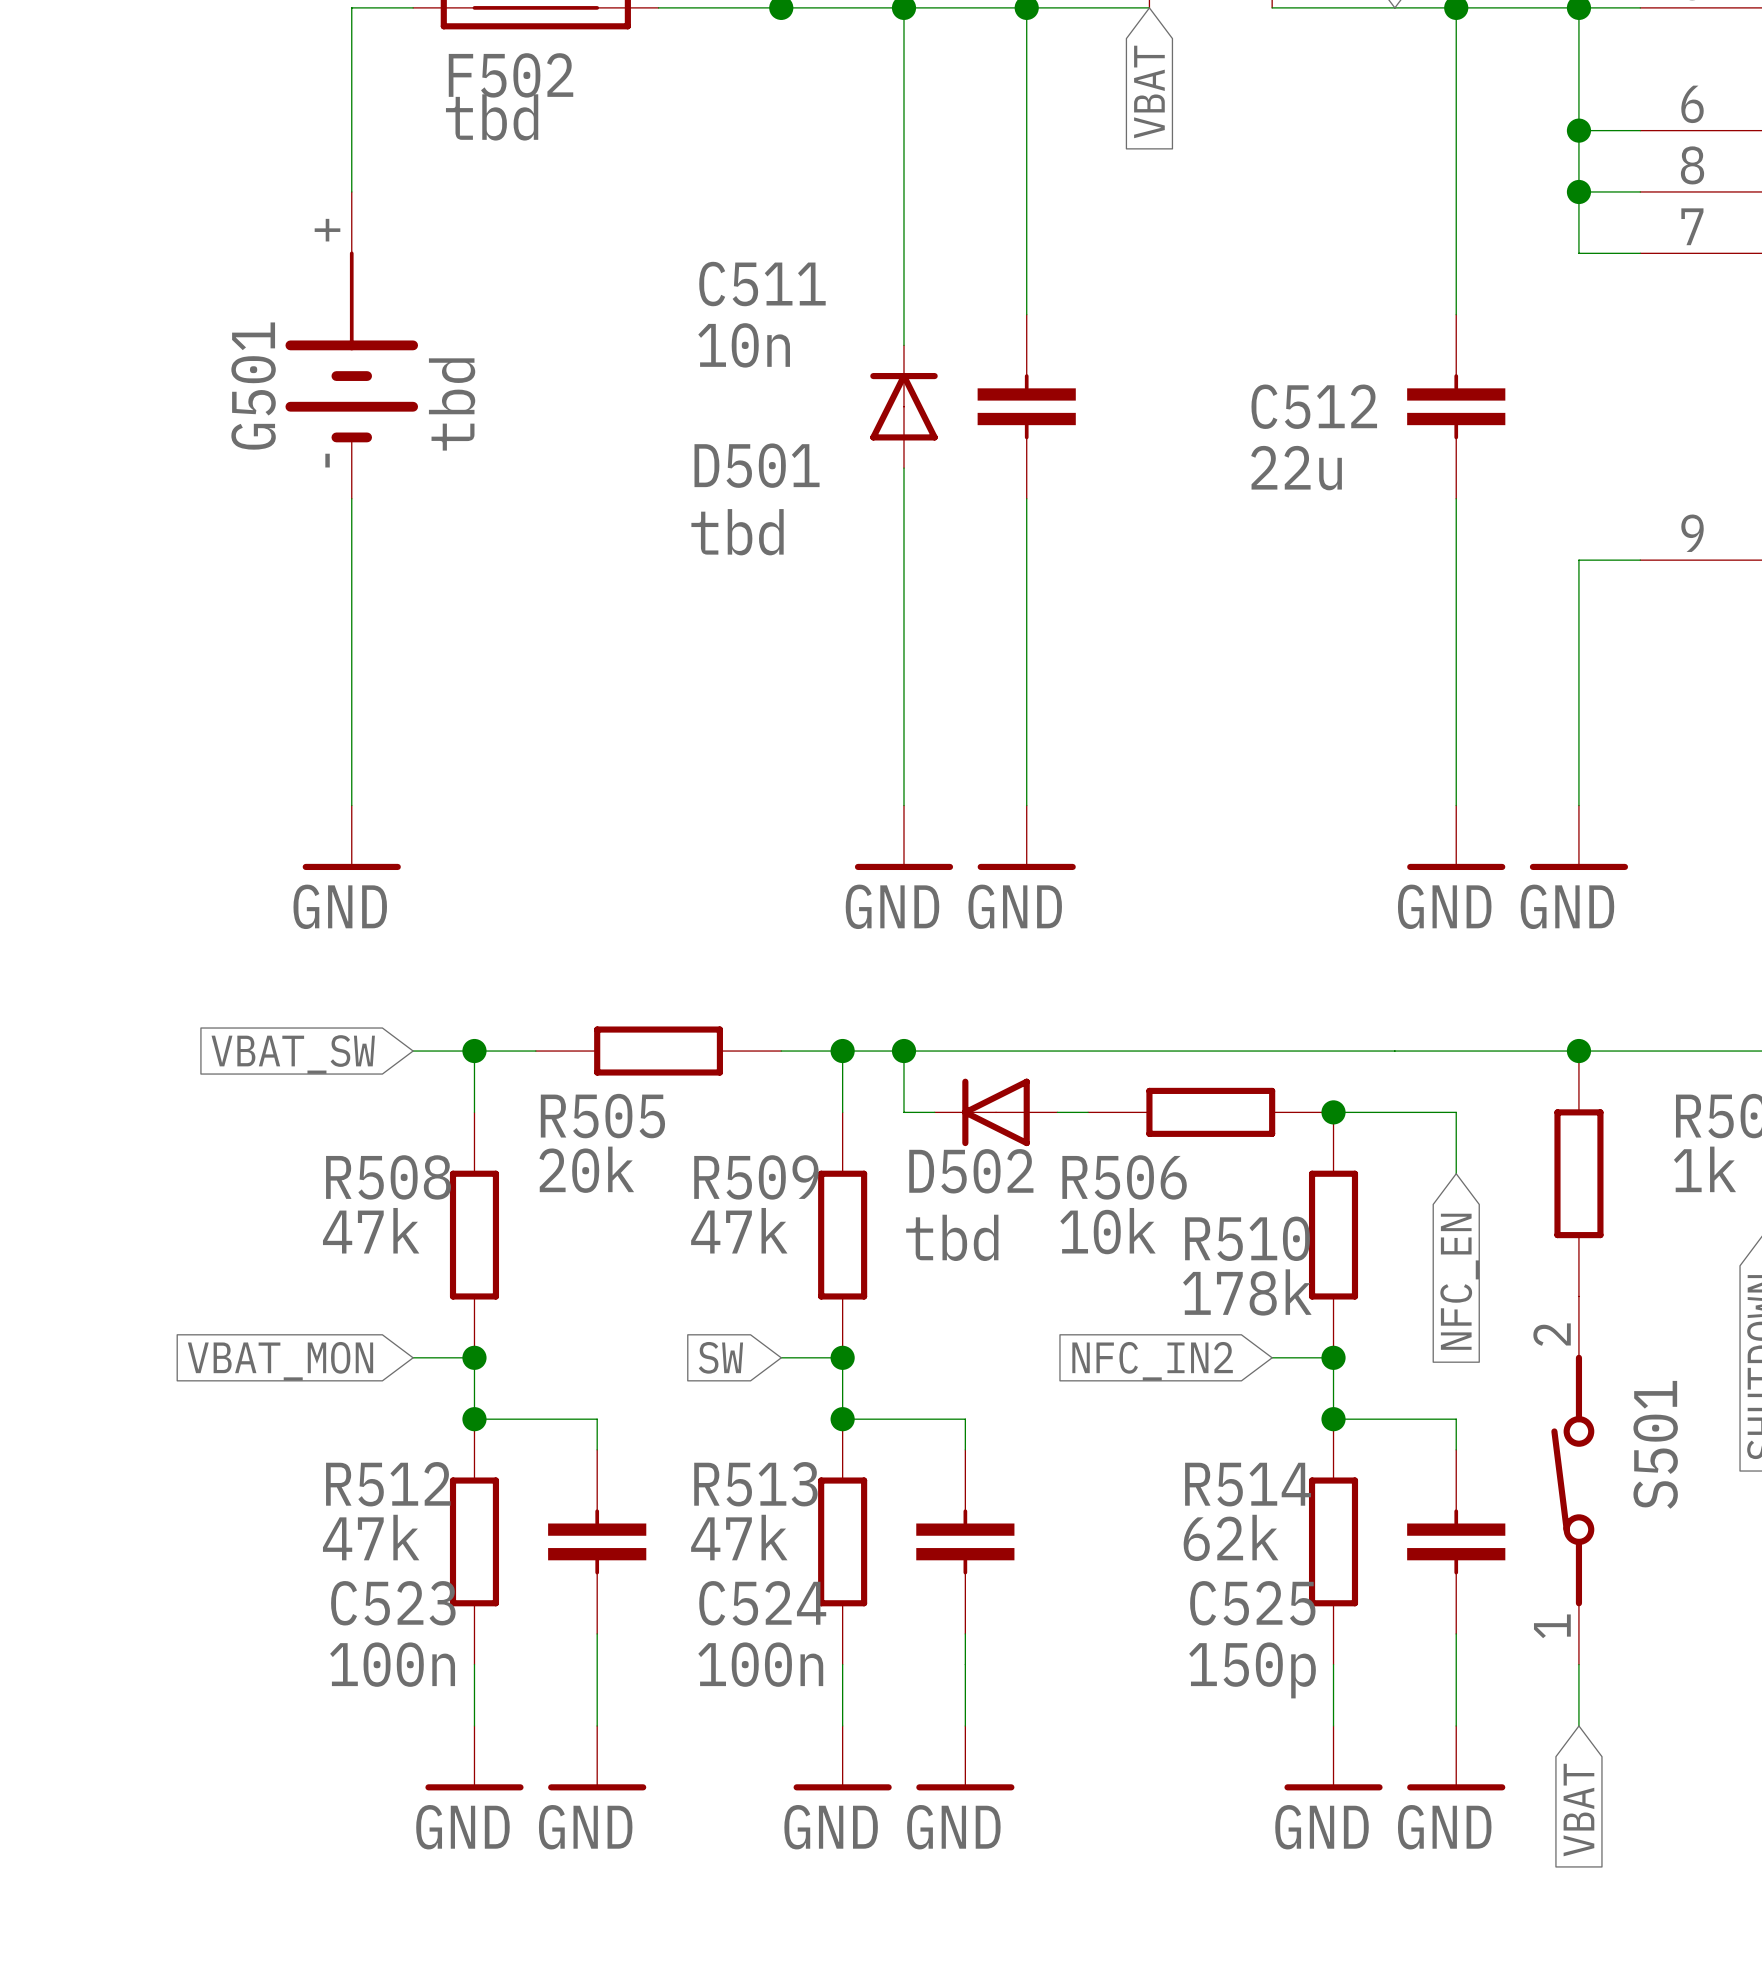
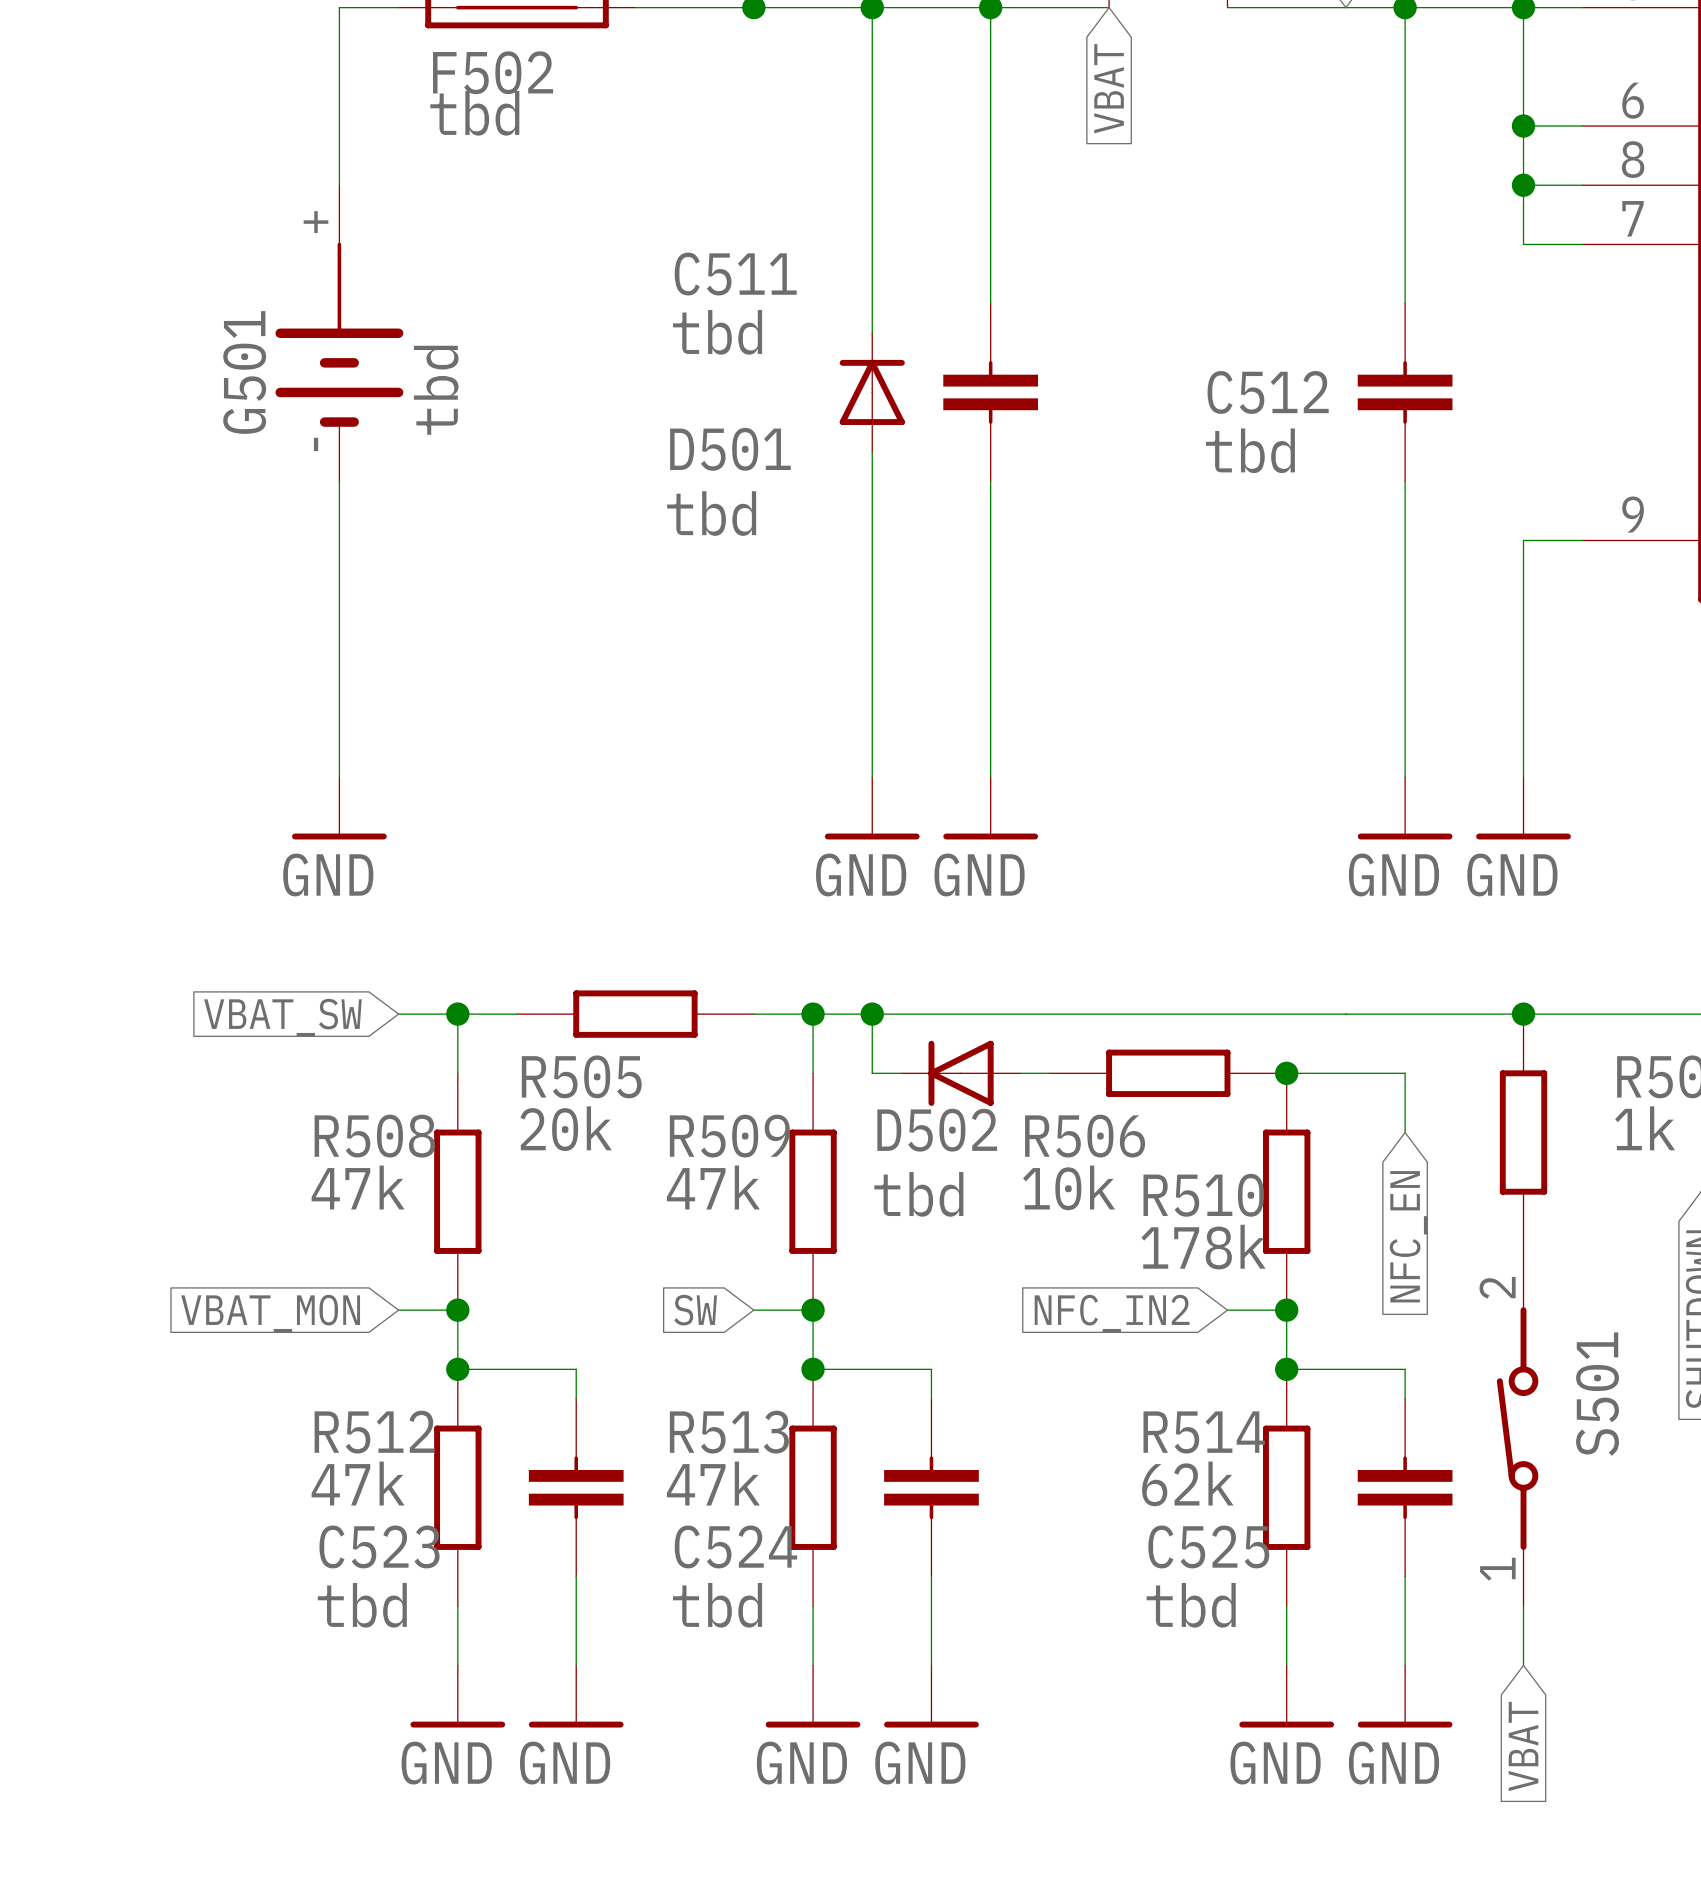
C511 value: 10n (744, 345) -> tbd (717, 332)
C512 value: 22u (1296, 468) -> tbd (1250, 450)
C523 value: 100n (392, 1664) -> tbd (362, 1605)
C524 value: 100n (760, 1664) -> tbd (717, 1605)
C525 value: 150p (1252, 1670) -> tbd (1191, 1605)

